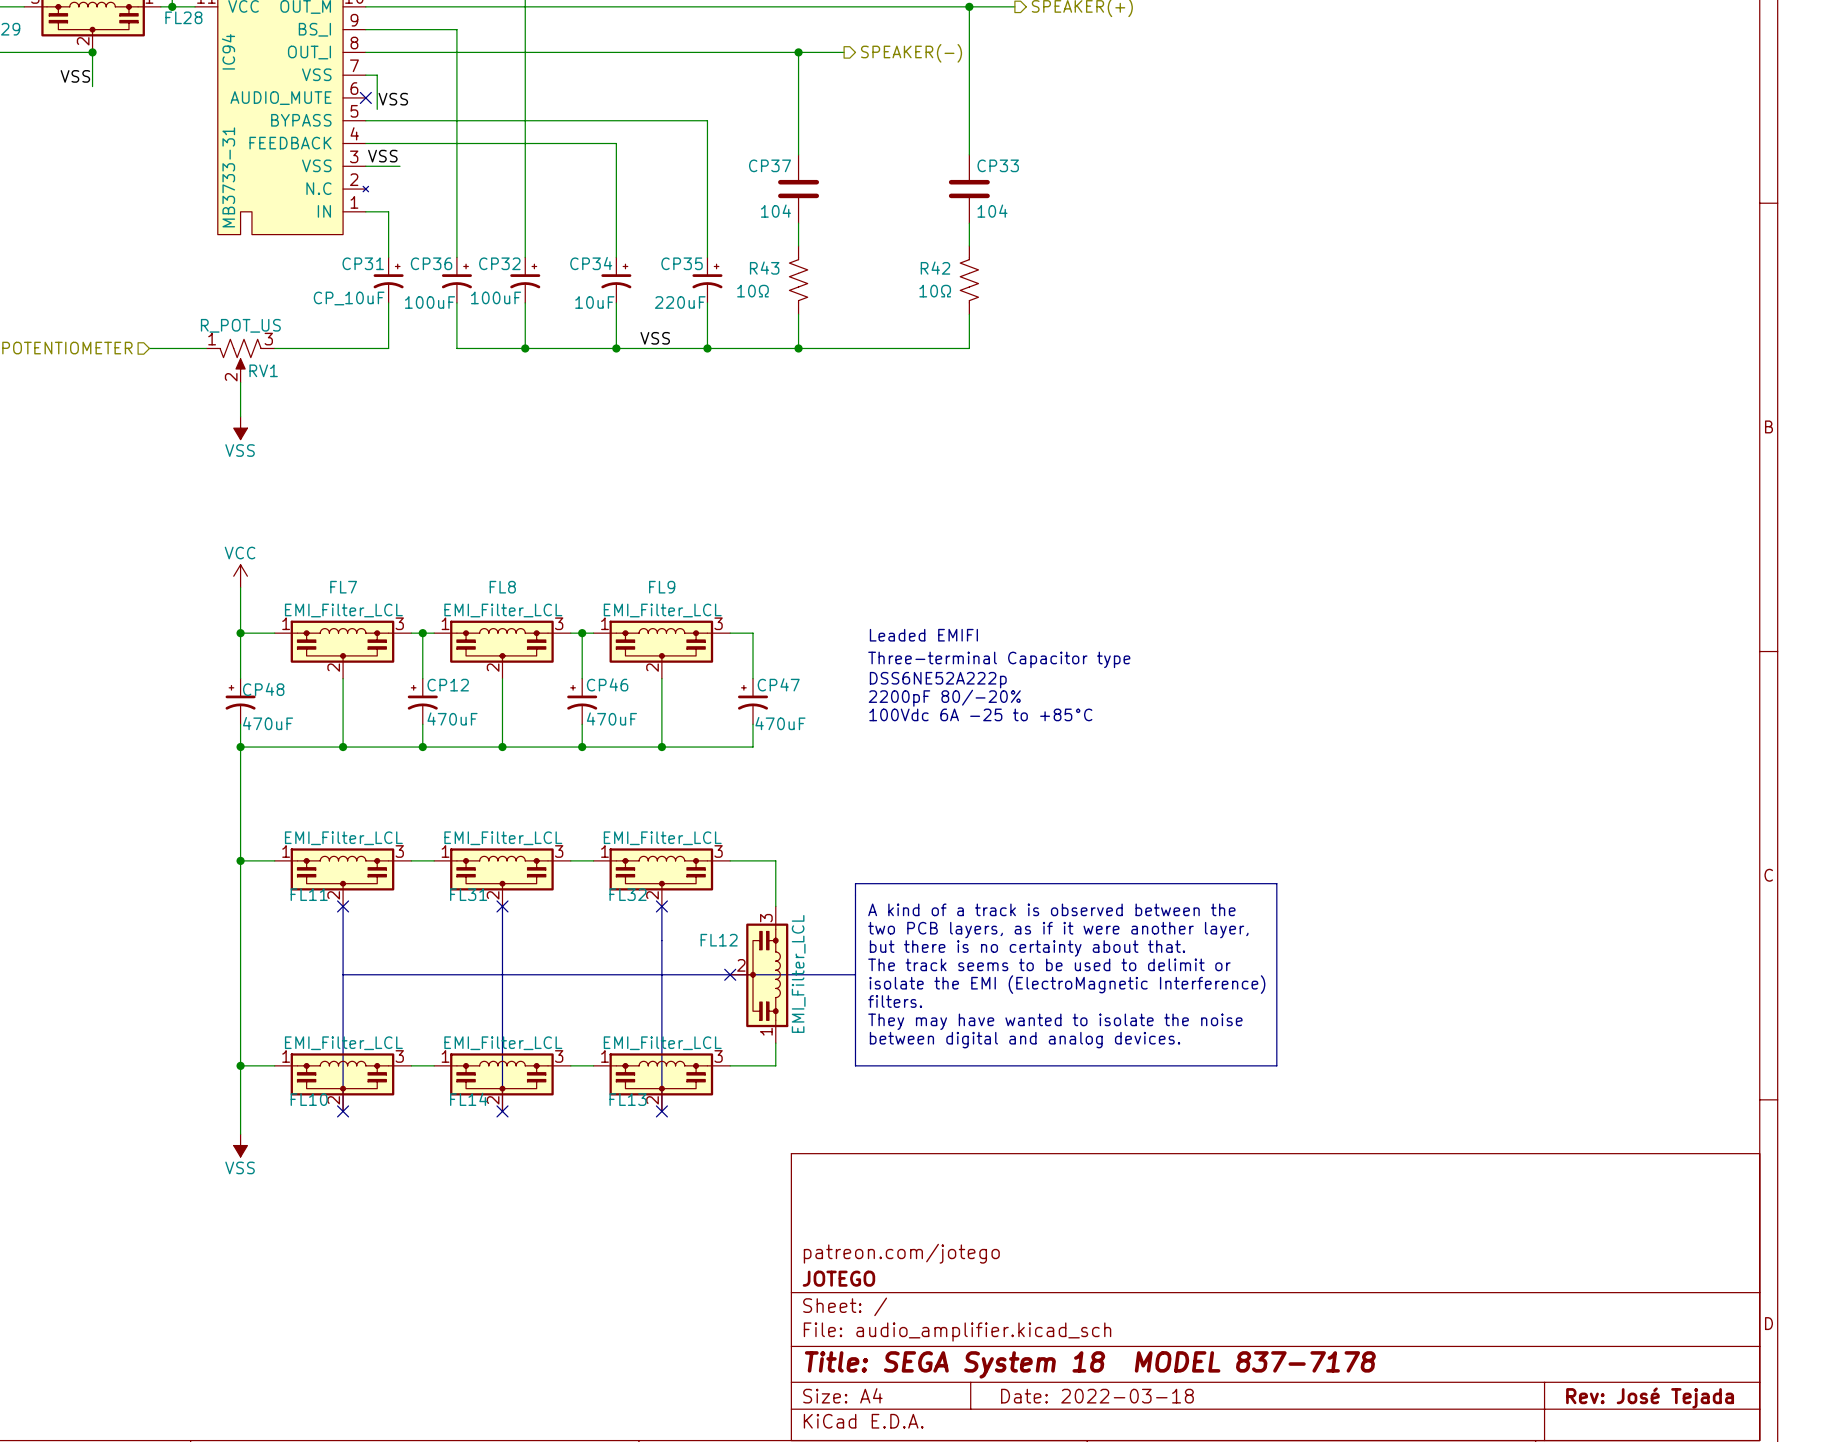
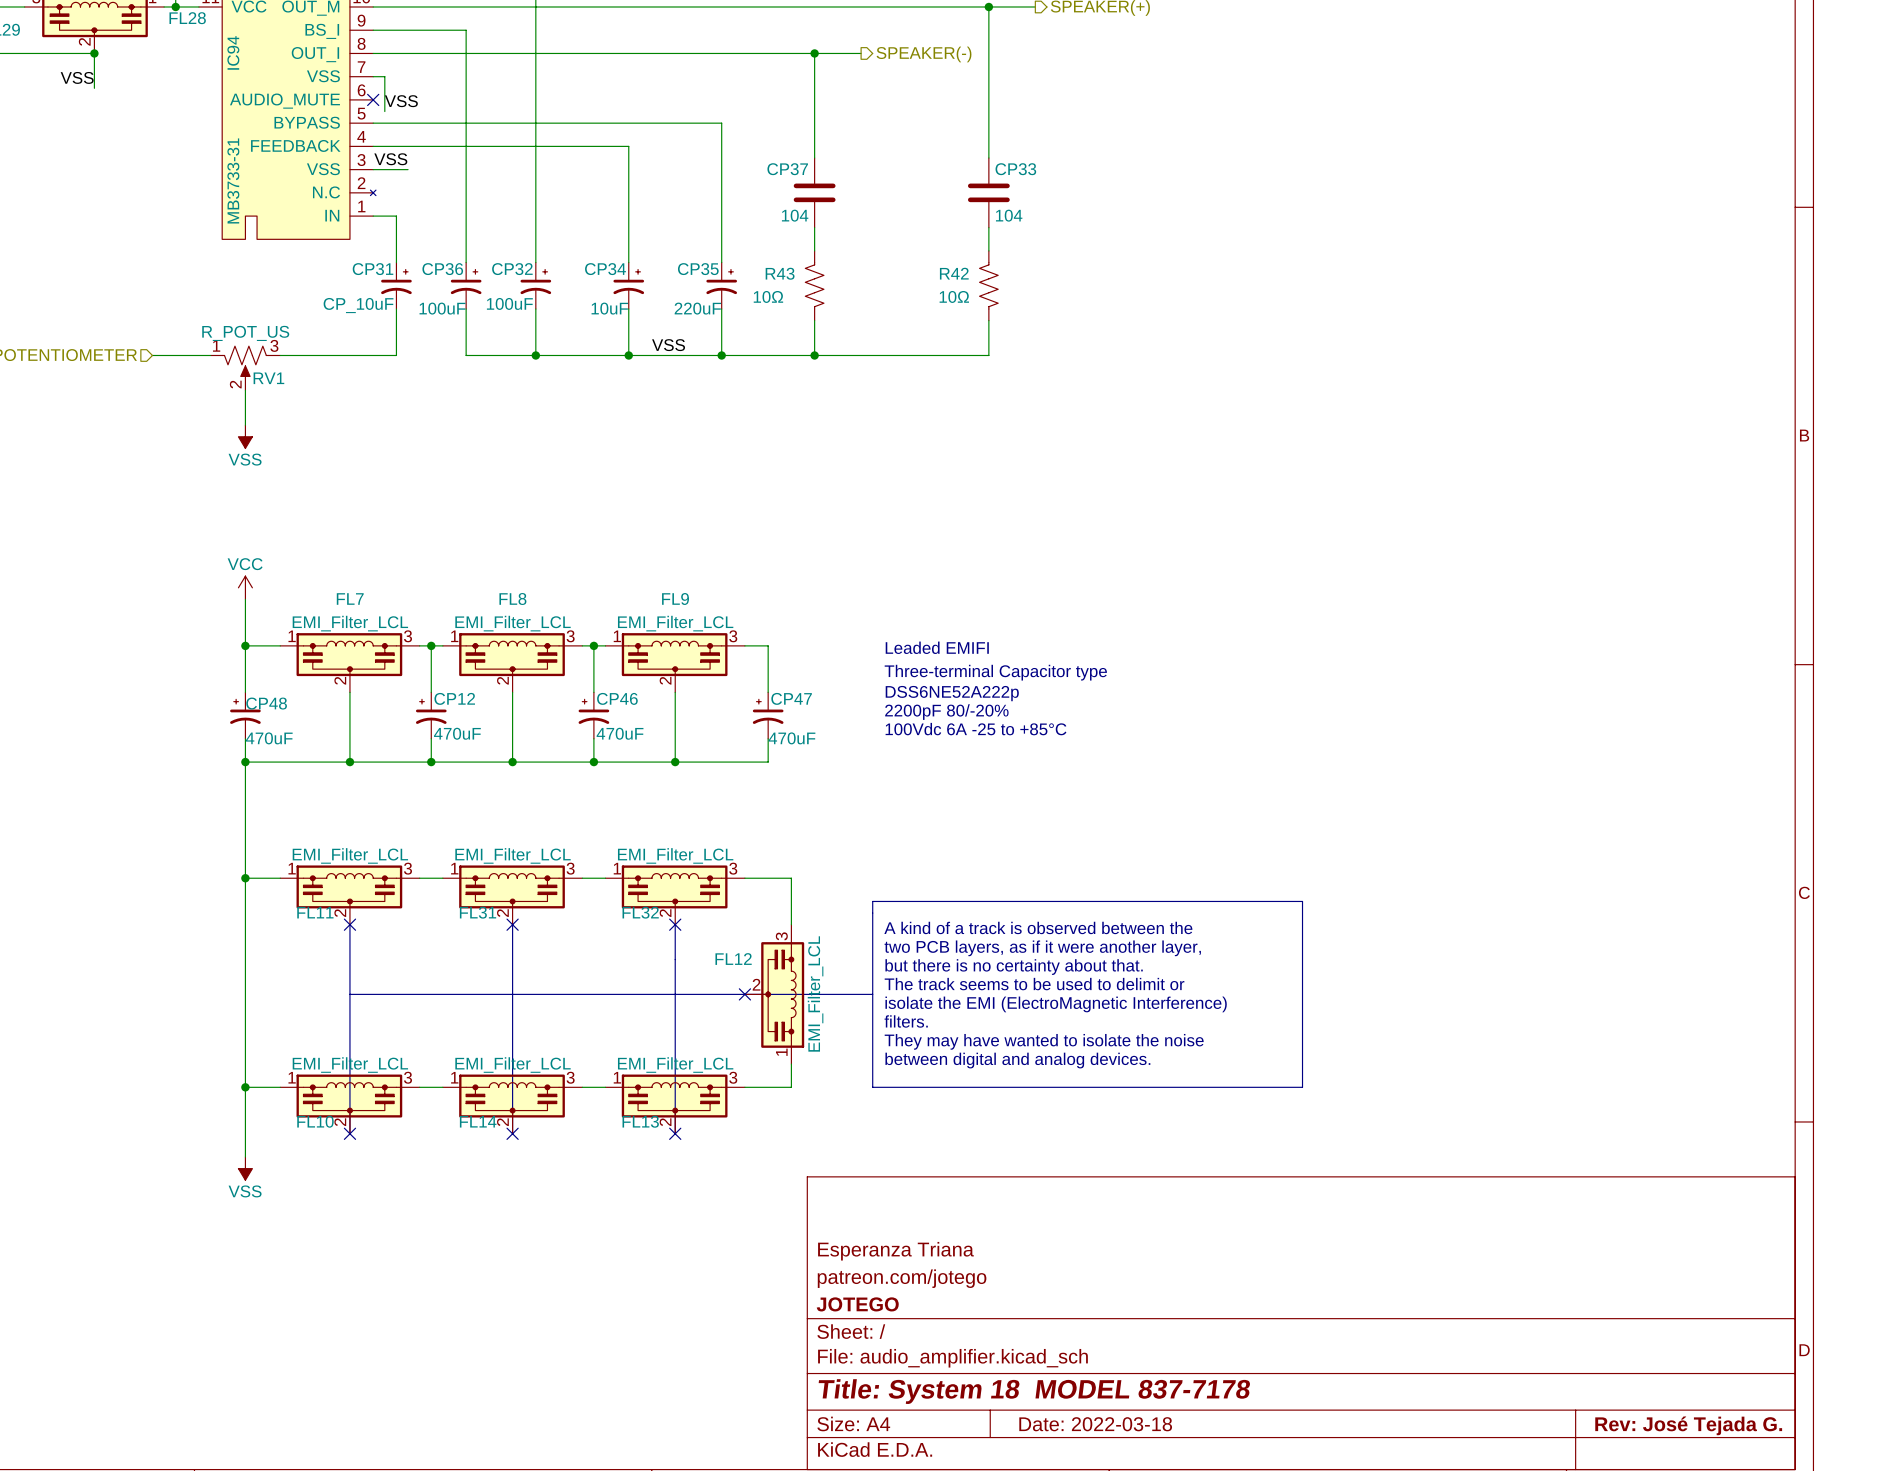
title block: none -> Esperanza Triana (895, 1251)
title block: Title: SEGA System 18 MODEL 837-7178 (1090, 1364) -> Title: System 18 MODEL 837-7178 (1034, 1391)
title block: Rev: José Tejada (1650, 1398) -> Rev: José Tejada G. (1688, 1425)

